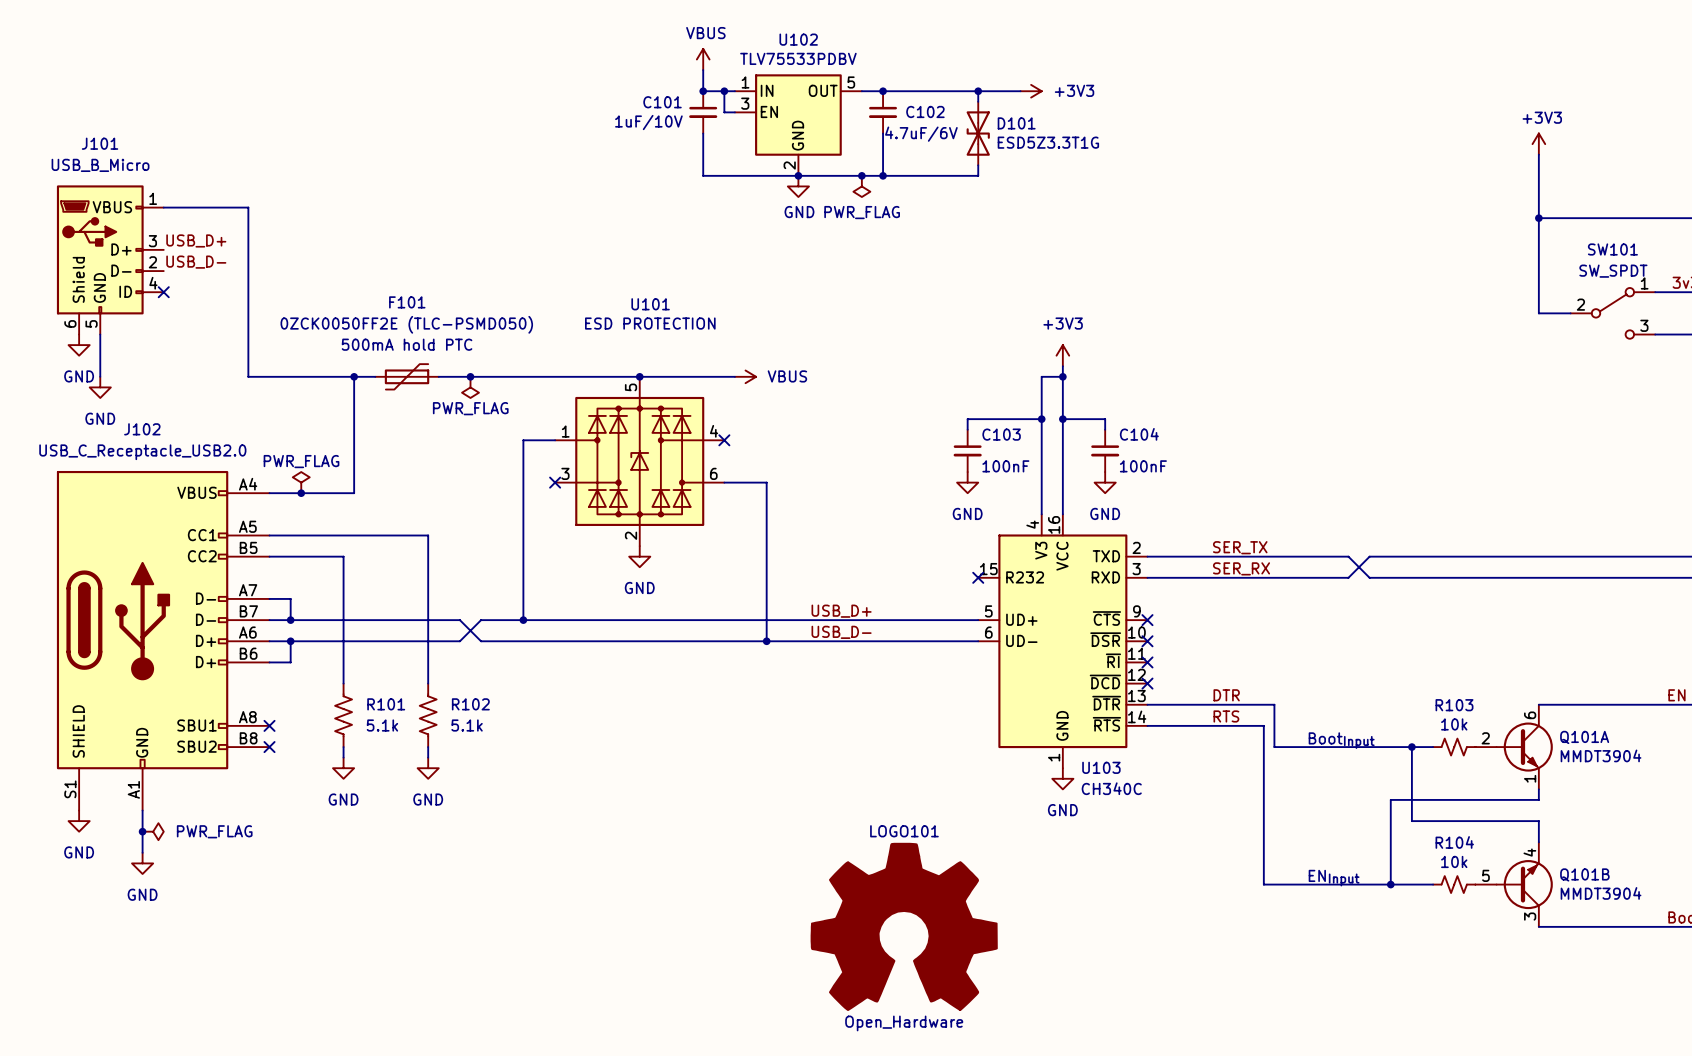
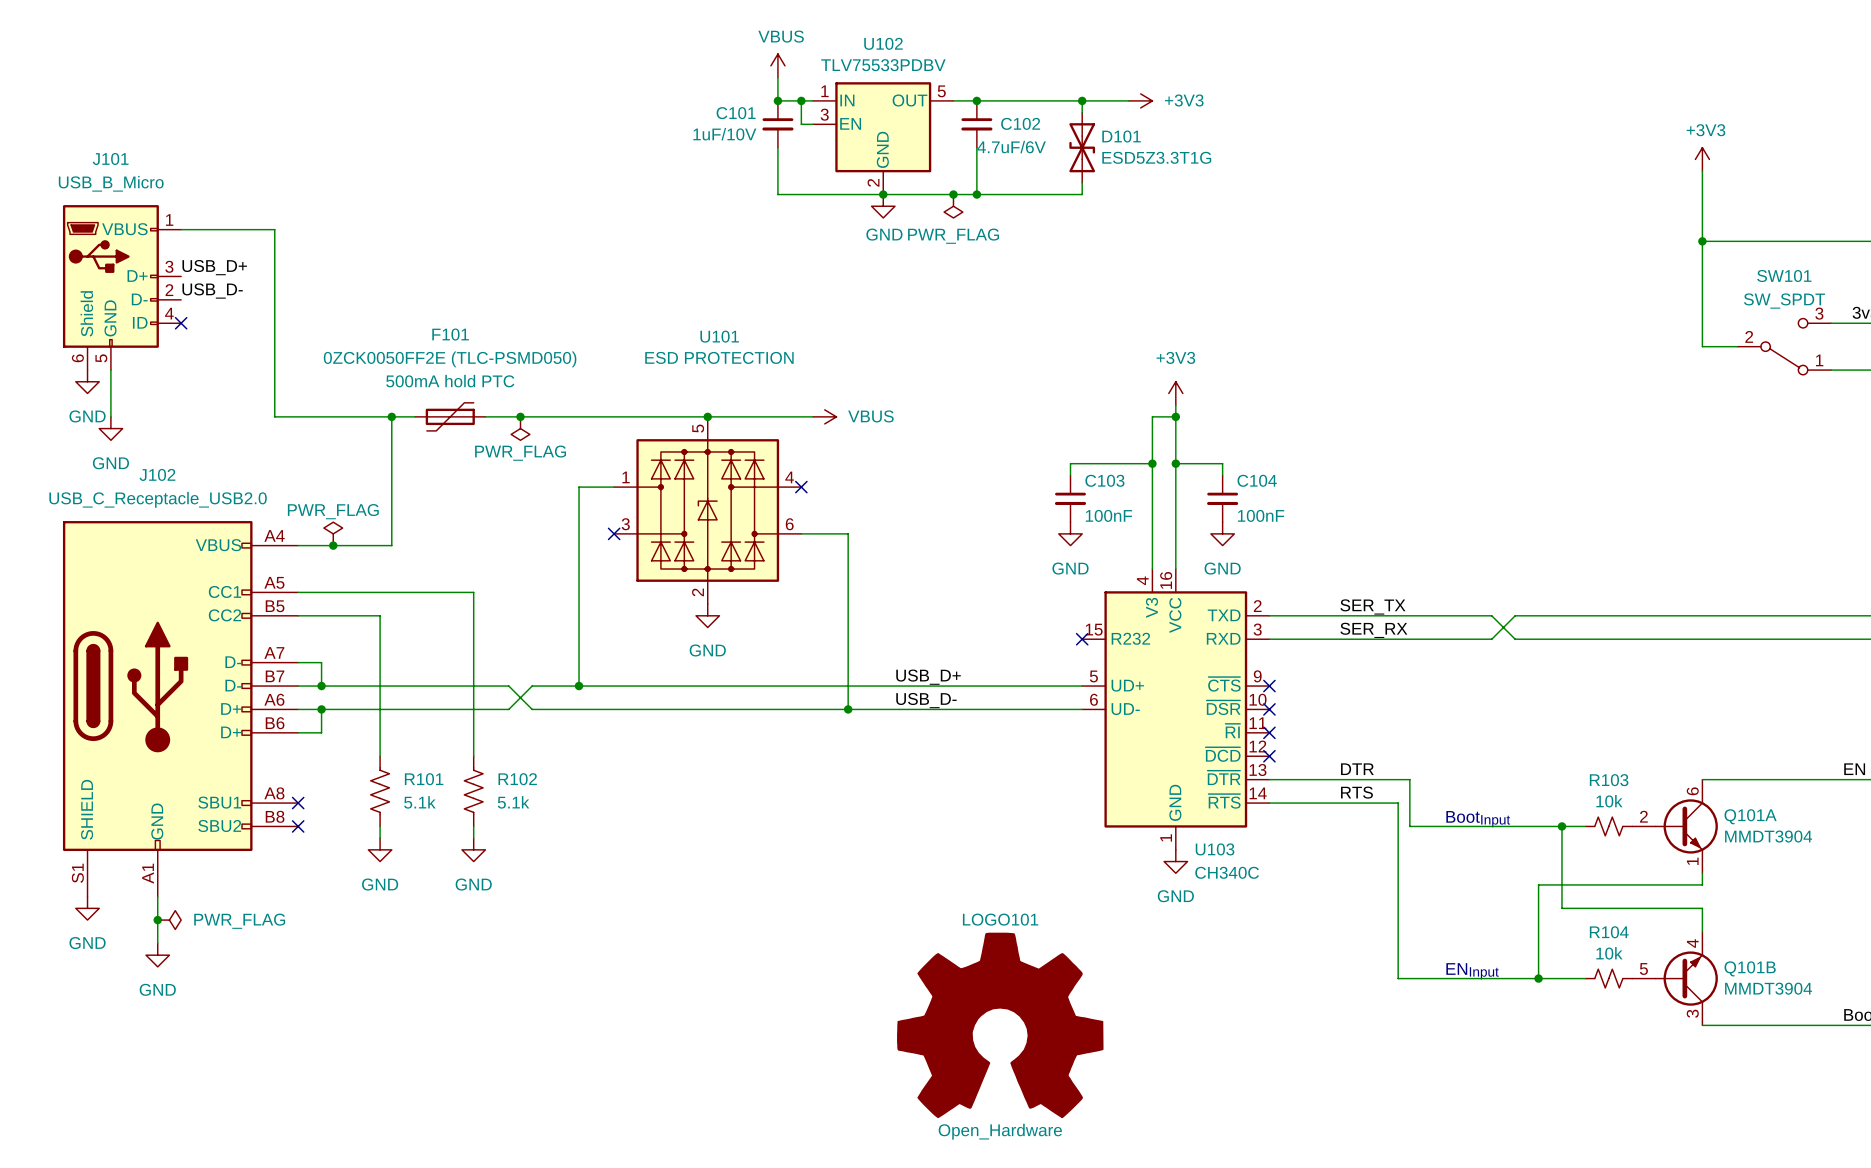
SW101 flip: as is (1612, 313) -> up-down (1784, 346)

